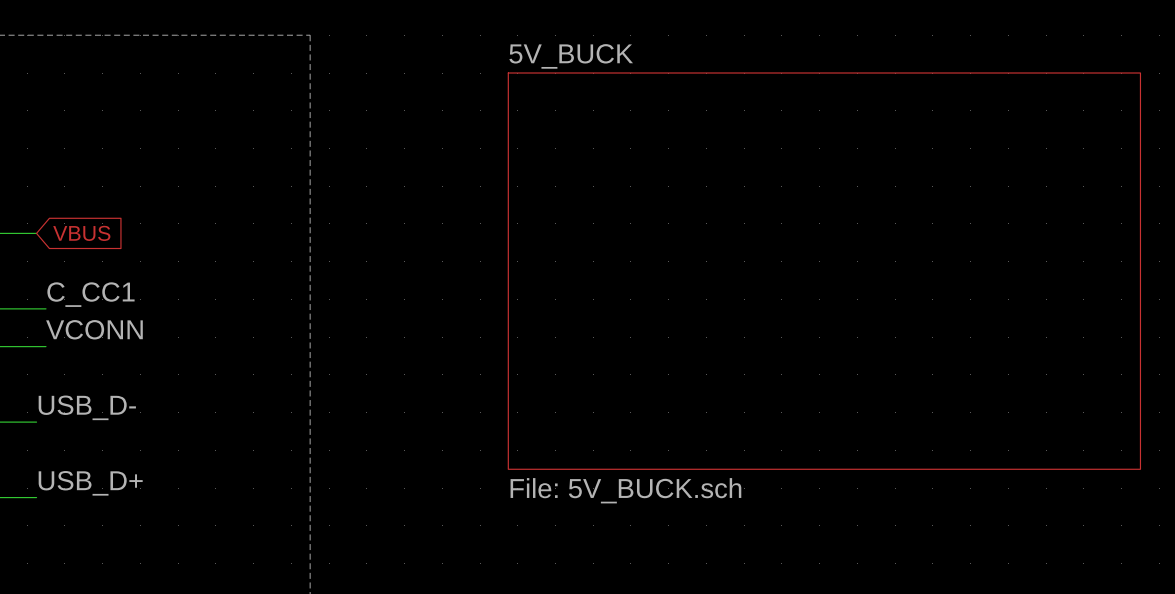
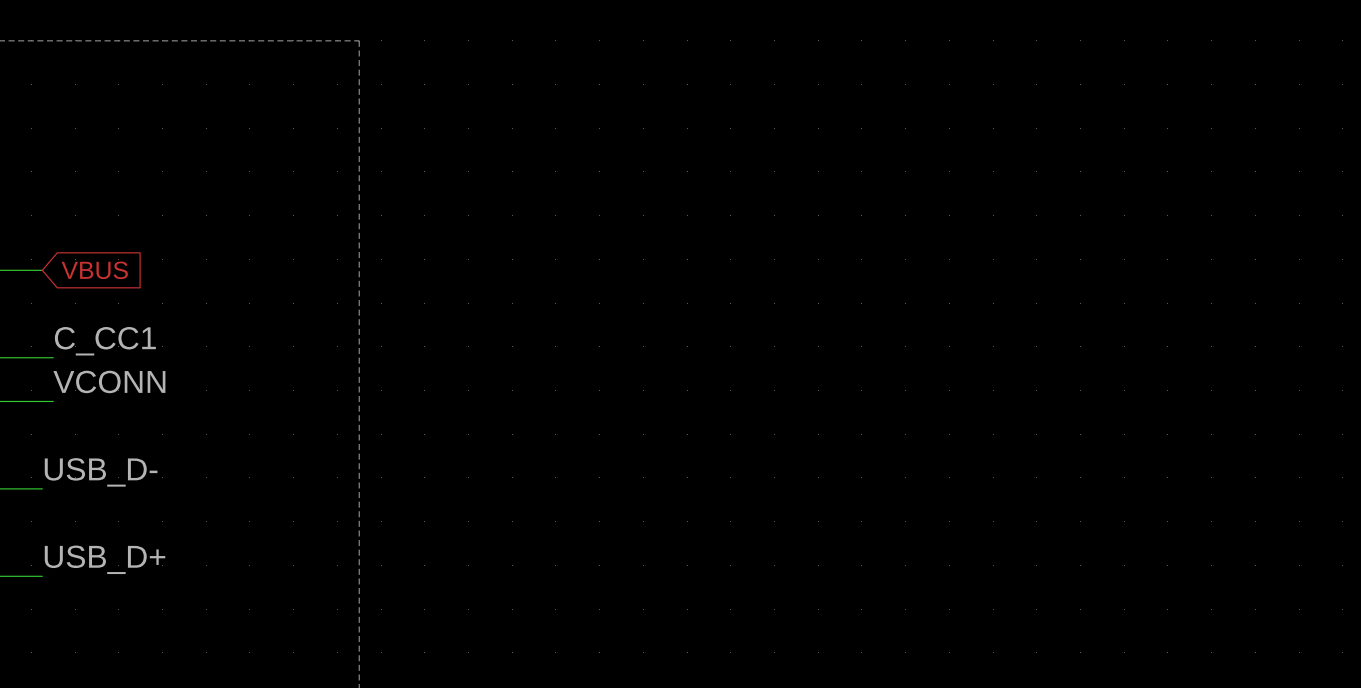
sheet 5V_BUCK: File: 5V_BUCK.sch (824, 271) -> none

